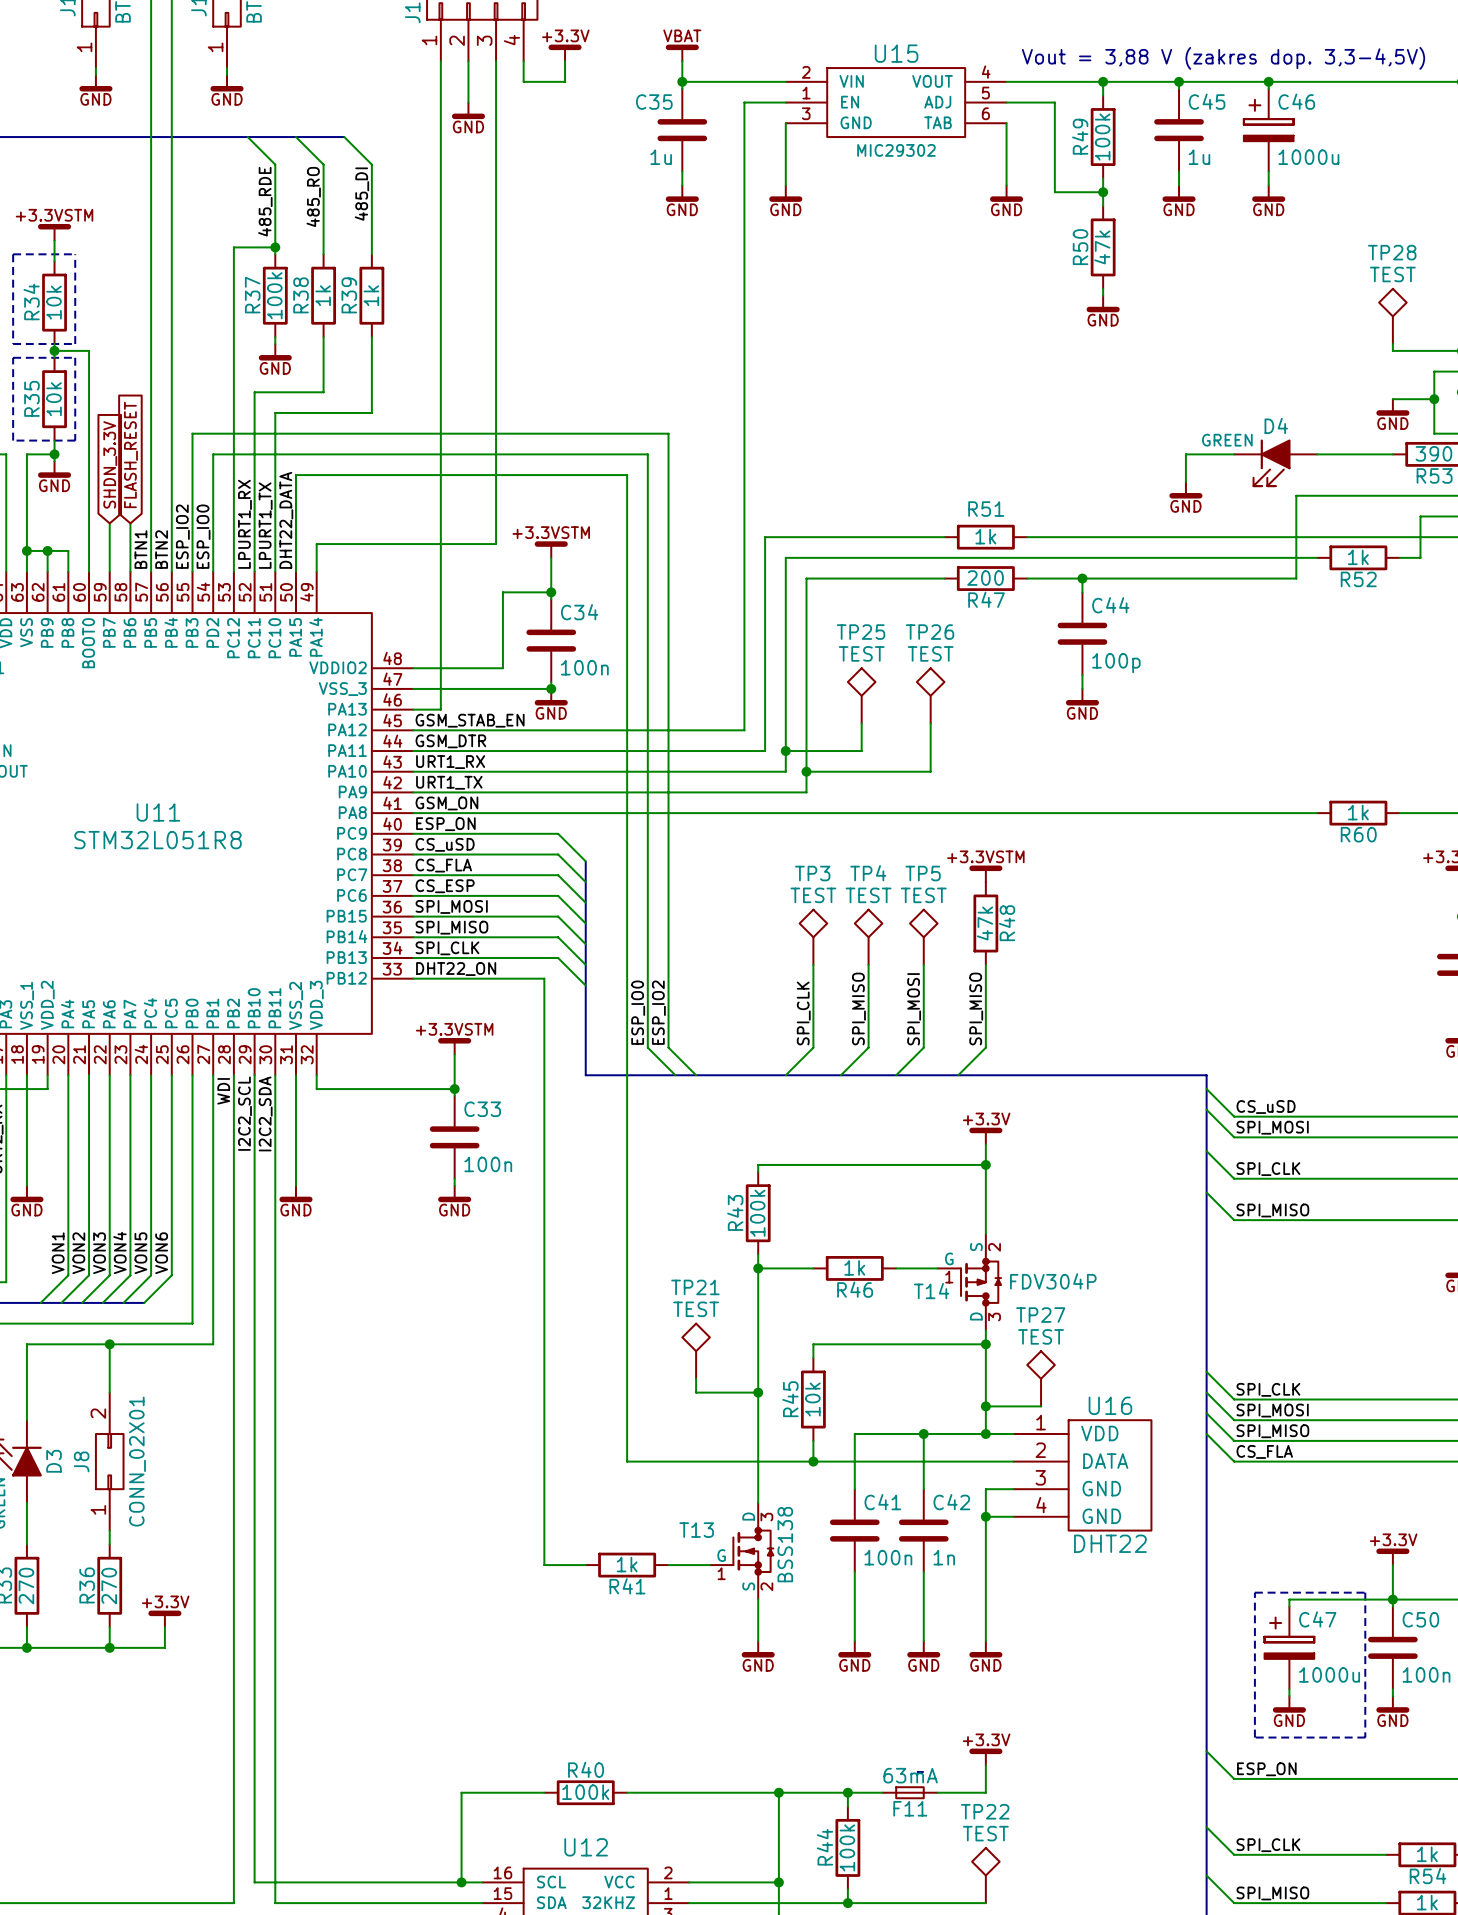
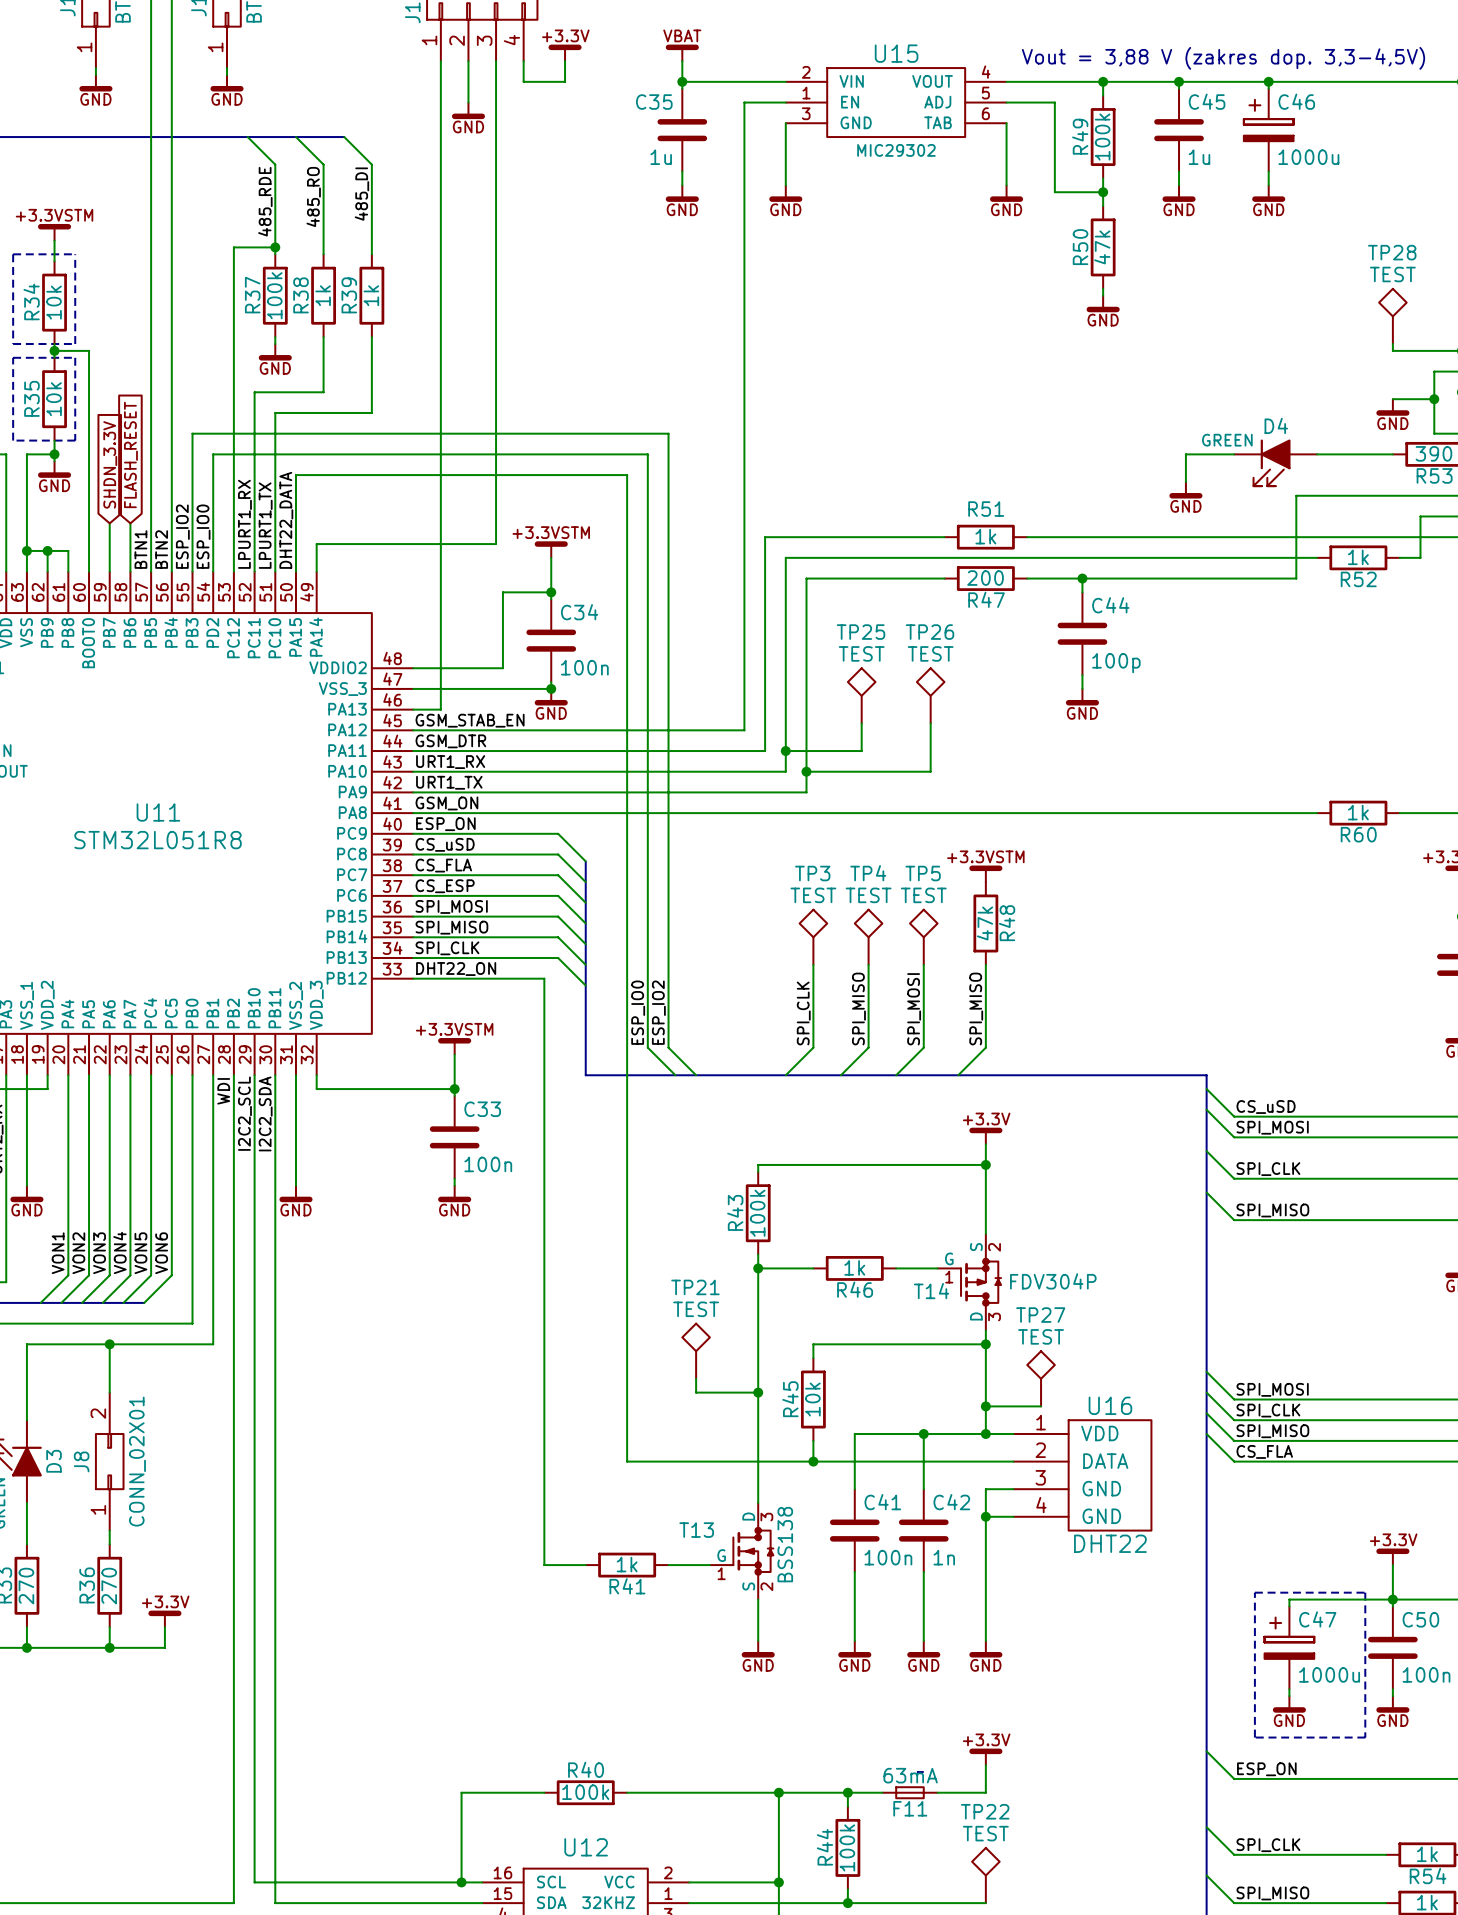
label: SPI_CLK (1268, 1389) -> SPI_MOSI (1272, 1389)
label: SPI_MOSI (1272, 1410) -> SPI_CLK (1268, 1410)

